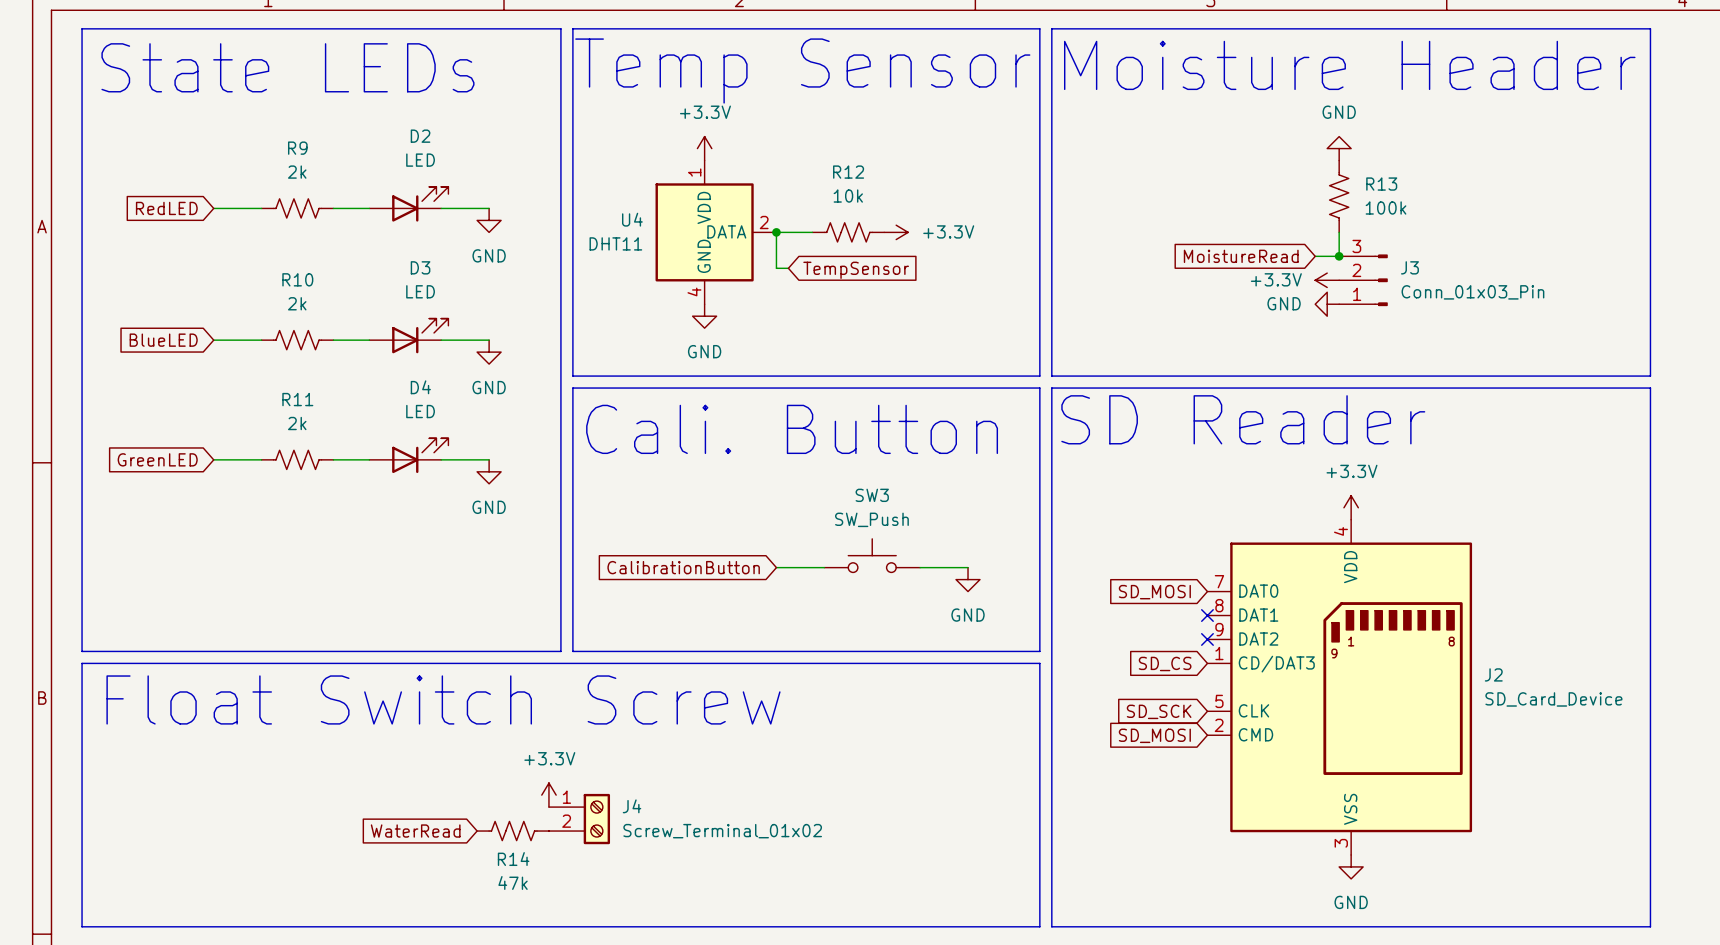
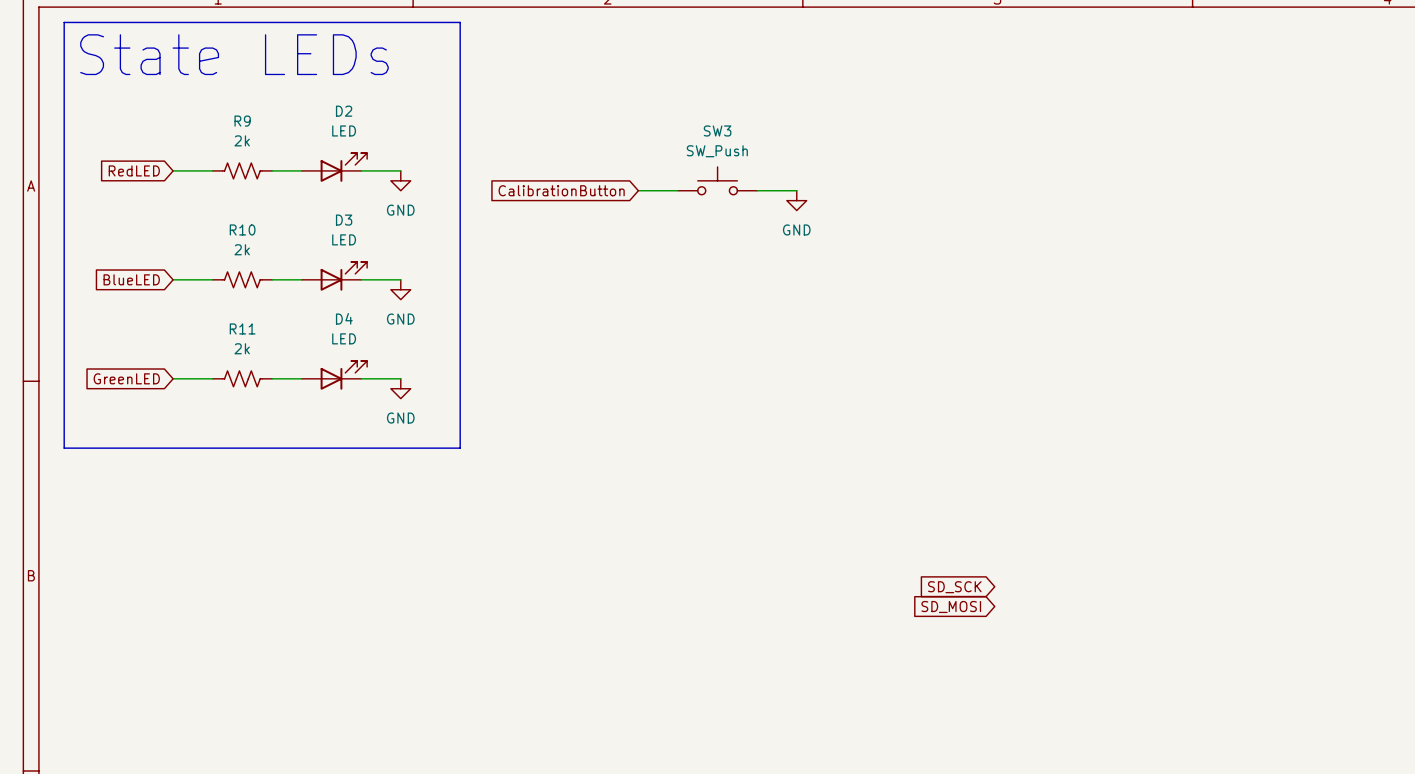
line: (572, 28) (572, 376) (1039, 376) (1039, 28) (572, 28) -> none
line: (1051, 28) (1650, 28) (1650, 376) (1051, 376) (1051, 28) -> none
text: Moisture Header (1349, 65) -> none
text: Temp Sensor (802, 71) -> none
power symbol: +3.3V (704, 148) -> none
power symbol: GND (1339, 148) -> none
R13: 100k (1339, 196) -> none
global label: none -> CalibrationButton (561, 190)
U4: DHT11 (715, 232) -> none
wire: (776, 232) (776, 268) (788, 268) -> none
junction: (776, 232) -> none
R12: 10k (848, 232) -> none
power symbol: +3.3V (896, 232) -> none
wire: none -> (757, 190) (796, 190)
wire: (1339, 232) (1339, 256) (1315, 256) -> none
power symbol: none -> GND (796, 200)
global label: MoistureRead (1241, 256) -> none
junction: (1339, 256) -> none
global label: TempSensor (856, 270) -> none
power symbol: +3.3V (1327, 280) -> none
J3: Conn_01x03_Pin (1363, 280) -> none
power symbol: GND (1327, 304) -> none
power symbol: GND (704, 316) -> none
line: (572, 388) (1039, 388) (1039, 651) (572, 651) (572, 388) -> none
line: (1051, 388) (1650, 388) (1650, 926) (1051, 926) (1051, 388) -> none
text: SD Reader (1243, 419) -> none
text: Cali. Button (792, 429) -> none
power symbol: +3.3V (1351, 507) -> none
line: (82, 543) (82, 651) (560, 651) (560, 543) -> (64, 448) (460, 448)
SW3 position: (872, 555) -> (717, 180)
global label: CalibrationButton (683, 567) -> none
wire: (776, 567) (824, 567) -> none
wire: (920, 567) (968, 567) -> none
power symbol: GND (968, 579) -> none
global label: SD_MOSI (1154, 592) -> none
no-connect mark: (1207, 615) -> none
no-connect mark: (1207, 639) -> none
line: (82, 663) (82, 926) (1039, 926) (1039, 663) (82, 663) -> none
global label: SD_CS (1165, 663) -> none
J2: SD_Card_Device (1339, 687) -> none
text: Float Switch Screw (443, 699) -> none
power symbol: +3.3V (548, 795) -> none
J4: Screw_Terminal_01x02 (579, 819) -> none
global label: WaterRead (415, 831) -> none
R14: 47k (513, 831) -> none
power symbol: GND (1351, 866) -> none

